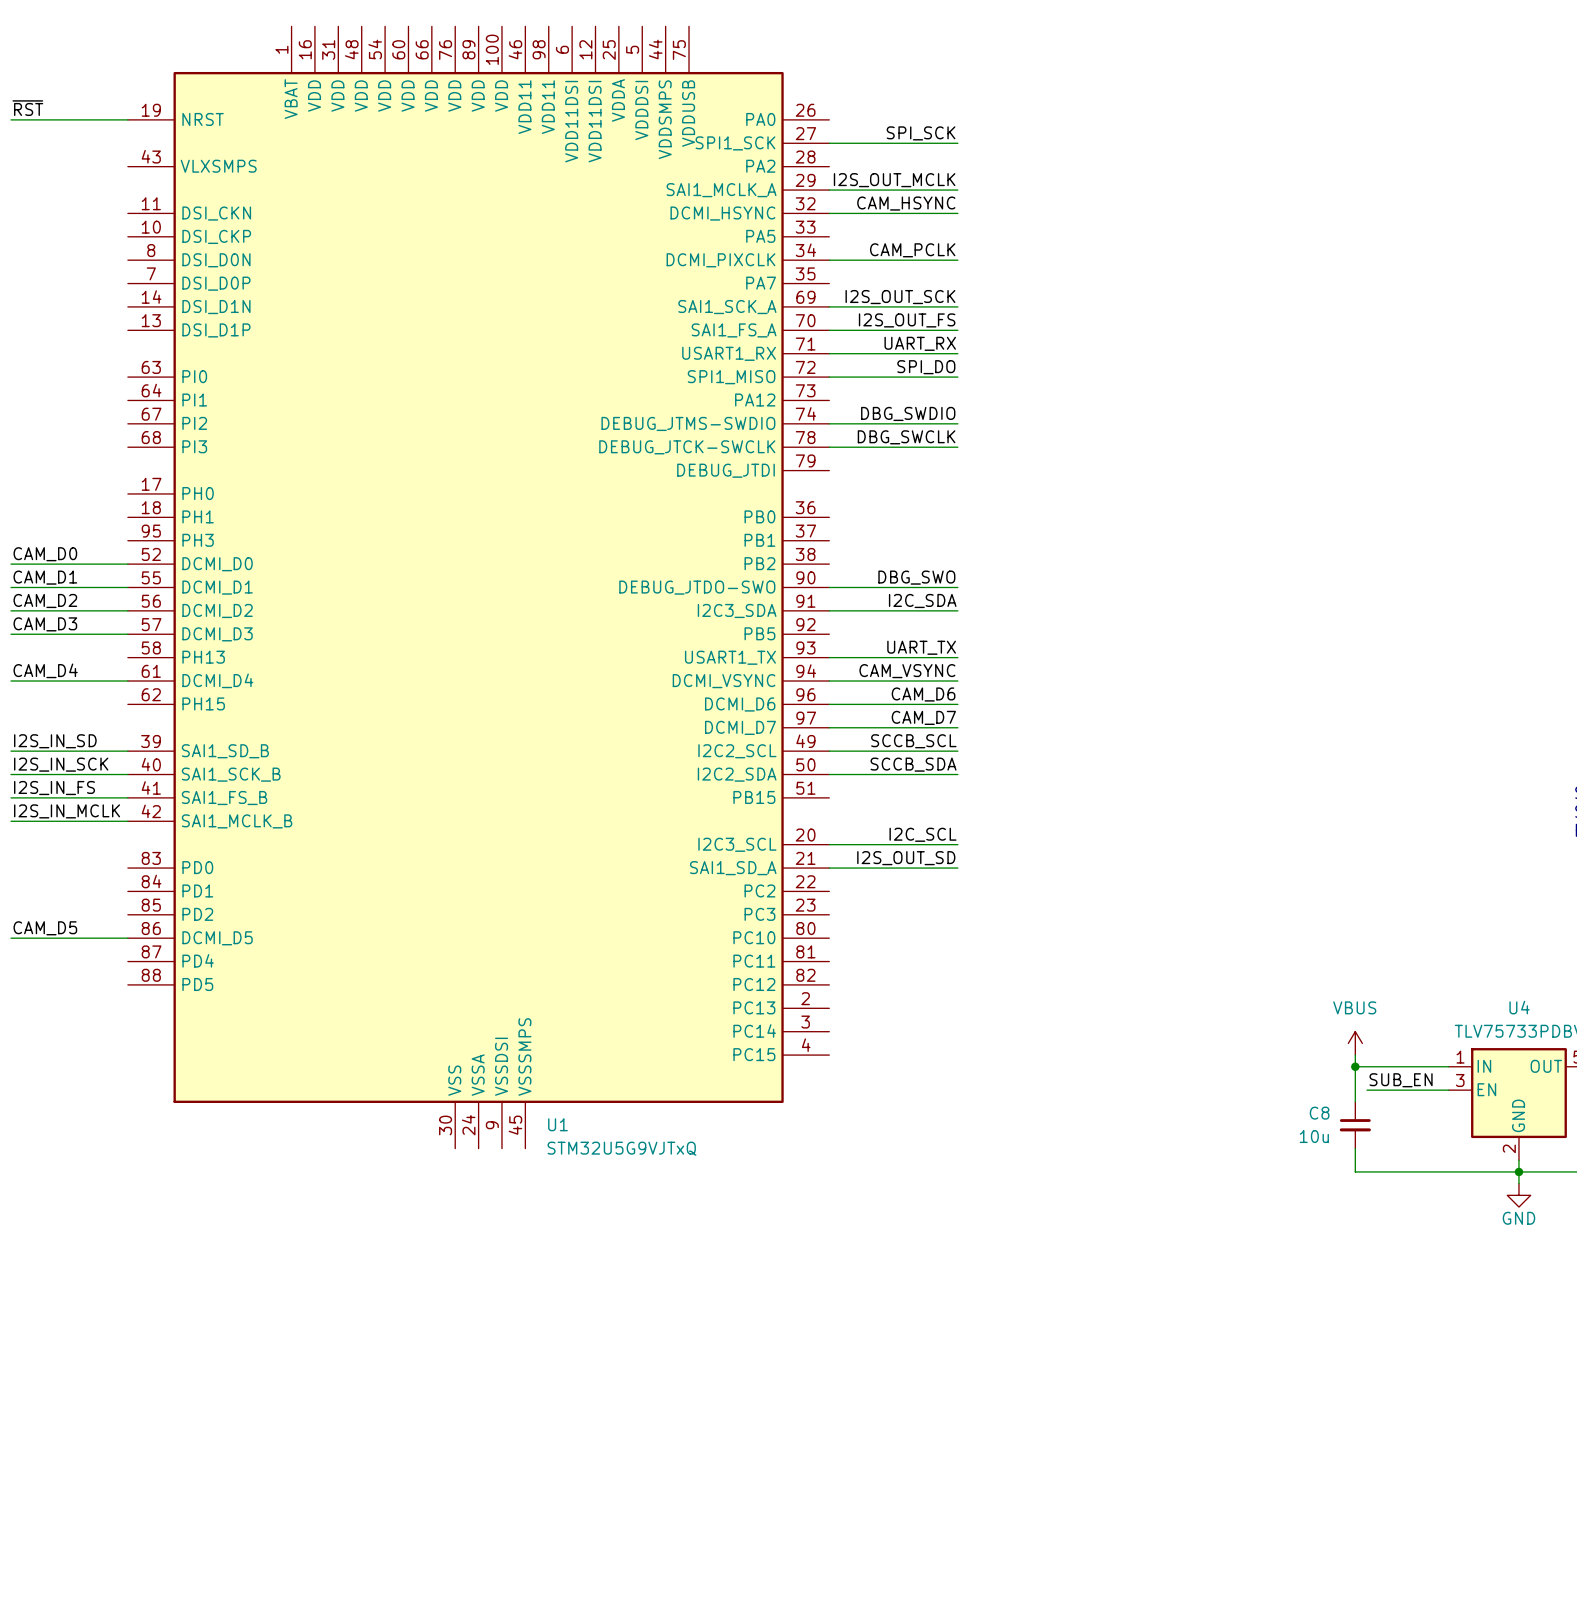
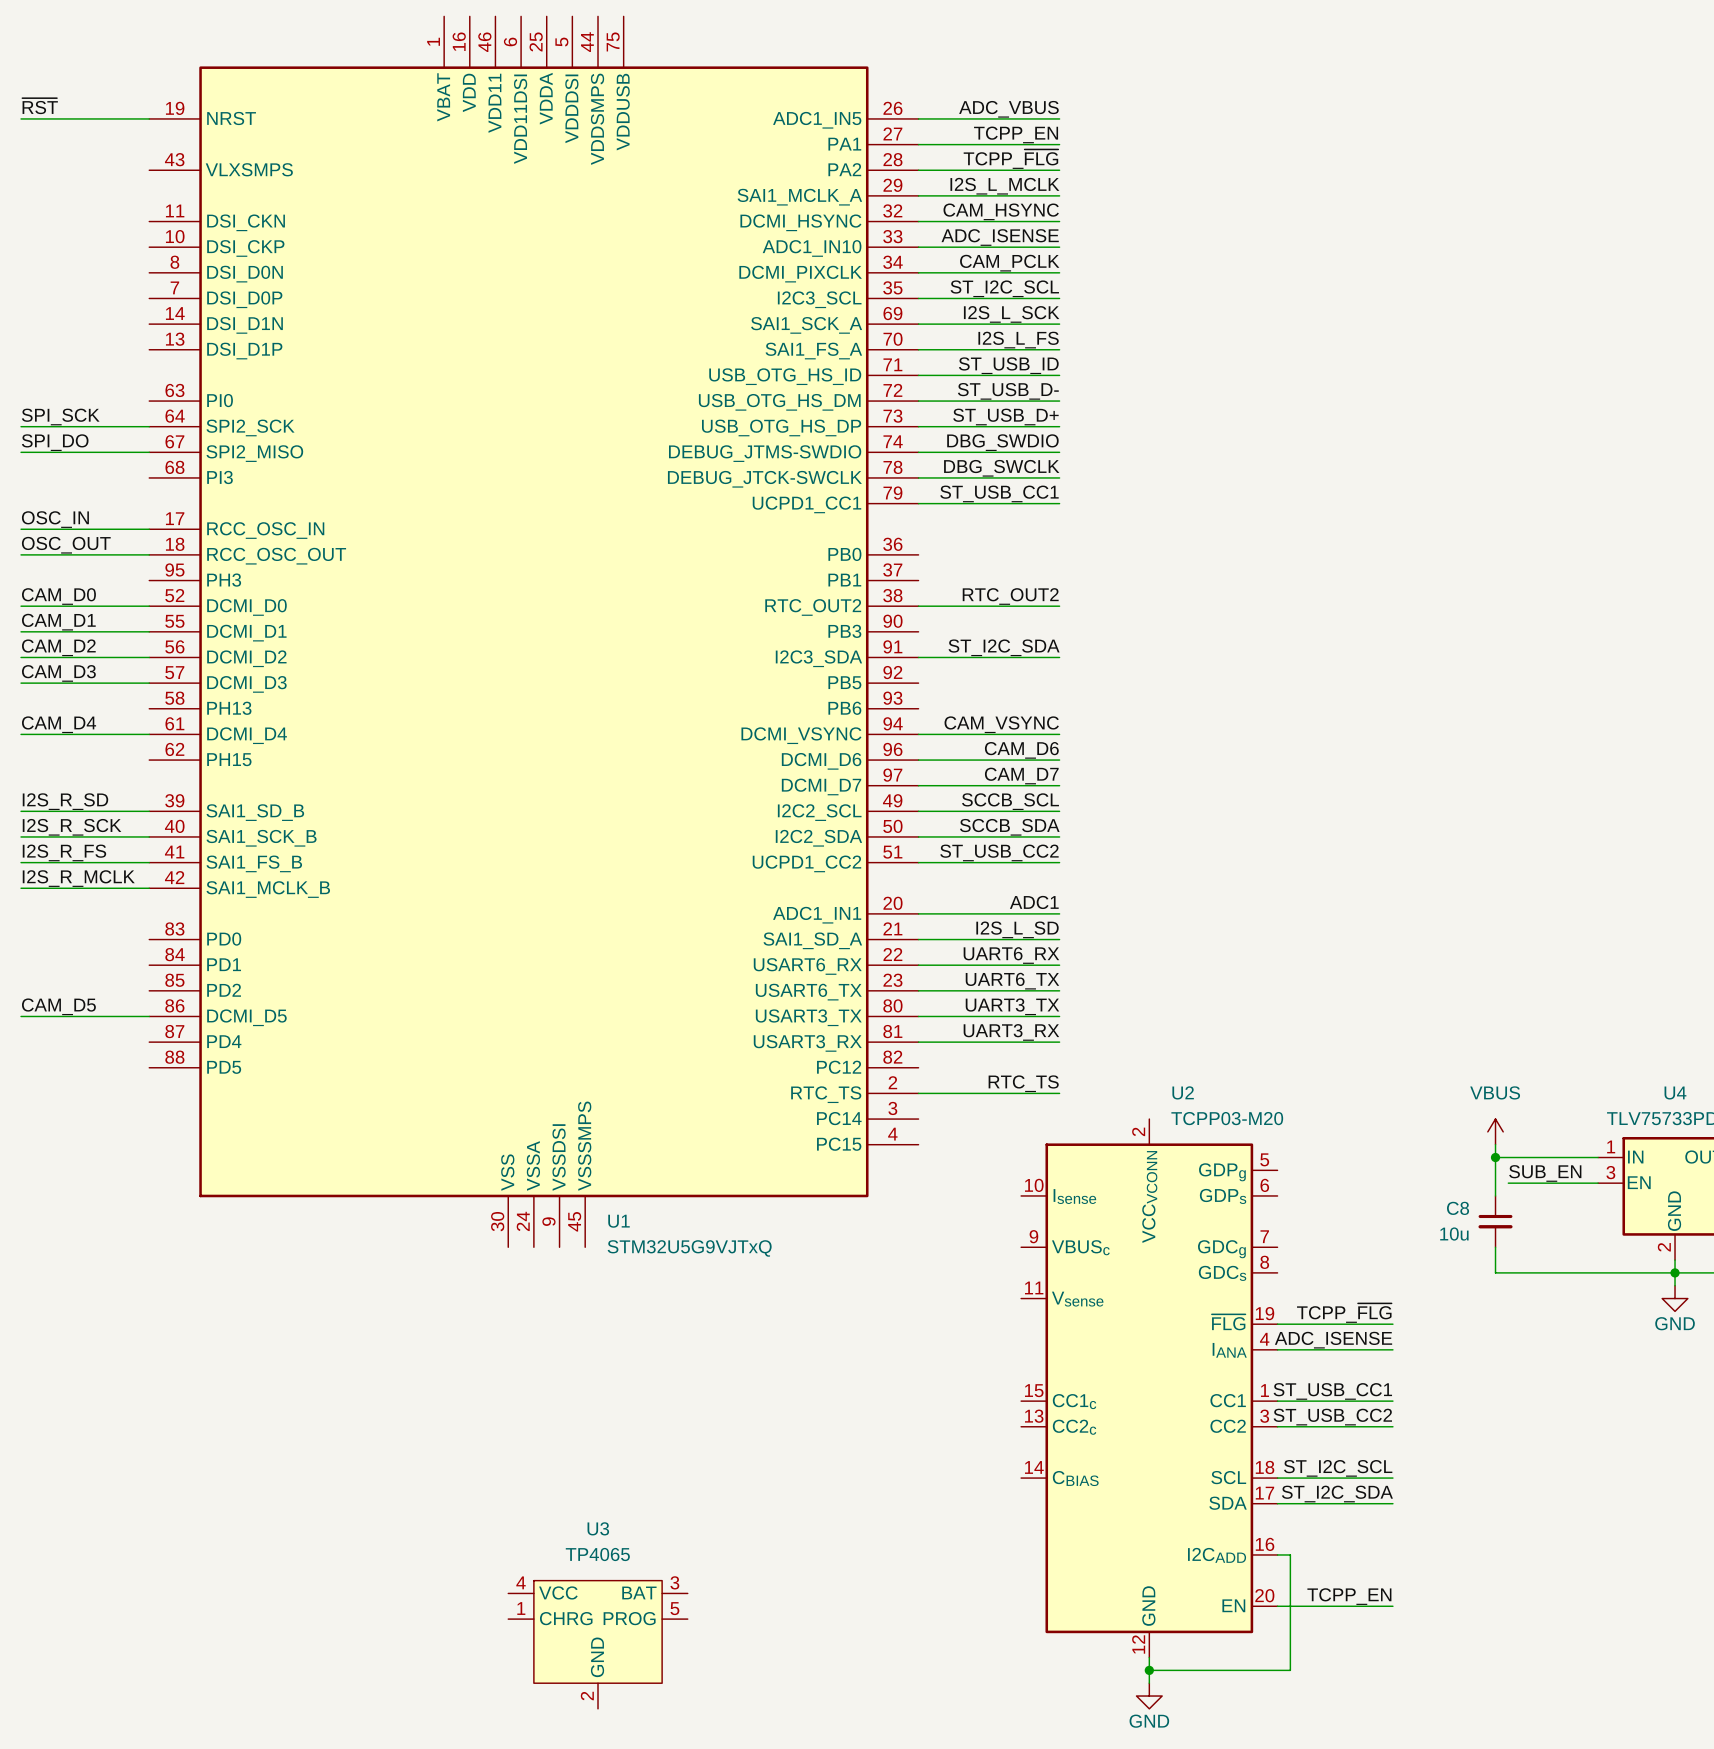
U1 symbol: [127, 26, 830, 1149] -> [149, 16, 919, 1248]
label: none -> ADC_VBUS (1008, 109)
wire: none -> (918, 118) (1059, 118)
label: SPI_SCK (921, 133) -> TCPP_EN (1016, 134)
label: none -> TCPP_~{FLG} (1010, 159)
wire: none -> (918, 170) (1059, 170)
label: I2S_OUT_MCLK (894, 180) -> I2S_L_MCLK (1004, 186)
label: none -> ADC_ISENSE (1000, 237)
wire: none -> (918, 247) (1059, 247)
label: none -> ST_I2C_SCL (1004, 288)
wire: none -> (918, 298) (1059, 298)
label: I2S_OUT_SCK (900, 297) -> I2S_L_SCK (1011, 314)
label: I2S_OUT_FS (907, 320) -> I2S_L_FS (1018, 340)
label: UART_RX (920, 343) -> ST_USB_ID (1008, 365)
label: SPI_DO (926, 367) -> ST_USB_D- (1008, 391)
label: none -> SPI_SCK (60, 417)
label: none -> ST_USB_D+ (1005, 417)
wire: none -> (21, 426) (149, 426)
label: none -> SPI_DO (55, 442)
wire: none -> (21, 452) (149, 452)
label: none -> ST_USB_CC1 (999, 493)
label: none -> OSC_IN (55, 519)
wire: none -> (21, 529) (149, 529)
label: none -> OSC_OUT (66, 545)
wire: none -> (21, 554) (149, 554)
label: none -> RTC_OUT2 (1010, 596)
wire: none -> (918, 606) (1059, 606)
label: DBG_SWO (916, 577) -> none
wire: (829, 587) (957, 587) -> (918, 426) (1059, 426)
label: I2C_SDA (922, 600) -> ST_I2C_SDA (1004, 647)
label: UART_TX (921, 647) -> none
wire: (829, 657) (957, 657) -> (918, 503) (1059, 503)
label: I2S_IN_SD (55, 741) -> I2S_R_SD (65, 801)
label: I2S_IN_SCK (61, 764) -> I2S_R_SCK (72, 827)
label: I2S_IN_FS (54, 788) -> I2S_R_FS (64, 852)
label: none -> ST_USB_CC2 (999, 852)
wire: none -> (918, 862) (1059, 862)
label: I2S_IN_MCLK (67, 811) -> I2S_R_MCLK (78, 878)
label: I2C_SCL (922, 834) -> ADC1 (1034, 902)
label: I2S_OUT_SD (906, 858) -> I2S_L_SD (1017, 929)
label: none -> UART6_RX (1011, 955)
wire: none -> (918, 965) (1059, 965)
label: none -> UART6_TX (1012, 981)
wire: none -> (918, 990) (1059, 990)
label: none -> UART3_TX (1012, 1006)
wire: none -> (918, 1016) (1059, 1016)
label: none -> UART3_RX (1011, 1032)
wire: none -> (918, 1042) (1059, 1042)
label: none -> RTC_TS (1023, 1083)
wire: none -> (918, 1093) (1059, 1093)
label: none -> TCPP_~{FLG} (1344, 1313)
wire: none -> (1277, 1324) (1392, 1324)
label: none -> ADC_ISENSE (1333, 1340)
wire: none -> (1277, 1349) (1392, 1349)
U2: none -> TCPP03-M20 (1149, 1388)
label: none -> ST_USB_CC1 (1332, 1391)
wire: none -> (1277, 1401) (1392, 1401)
label: none -> ST_USB_CC2 (1332, 1417)
wire: none -> (1277, 1426) (1392, 1426)
label: none -> ST_I2C_SCL (1338, 1468)
wire: none -> (1277, 1478) (1392, 1478)
label: none -> ST_I2C_SDA (1337, 1494)
wire: none -> (1277, 1503) (1392, 1503)
wire: none -> (1277, 1554) (1290, 1554) (1290, 1670) (1149, 1670)
label: none -> TCPP_EN (1349, 1596)
wire: none -> (1277, 1606) (1392, 1606)
U3: none -> TP4065 (598, 1644)
wire: none -> (1149, 1657) (1149, 1683)
junction: none -> (1149, 1670)
power symbol: none -> GND (1149, 1696)

